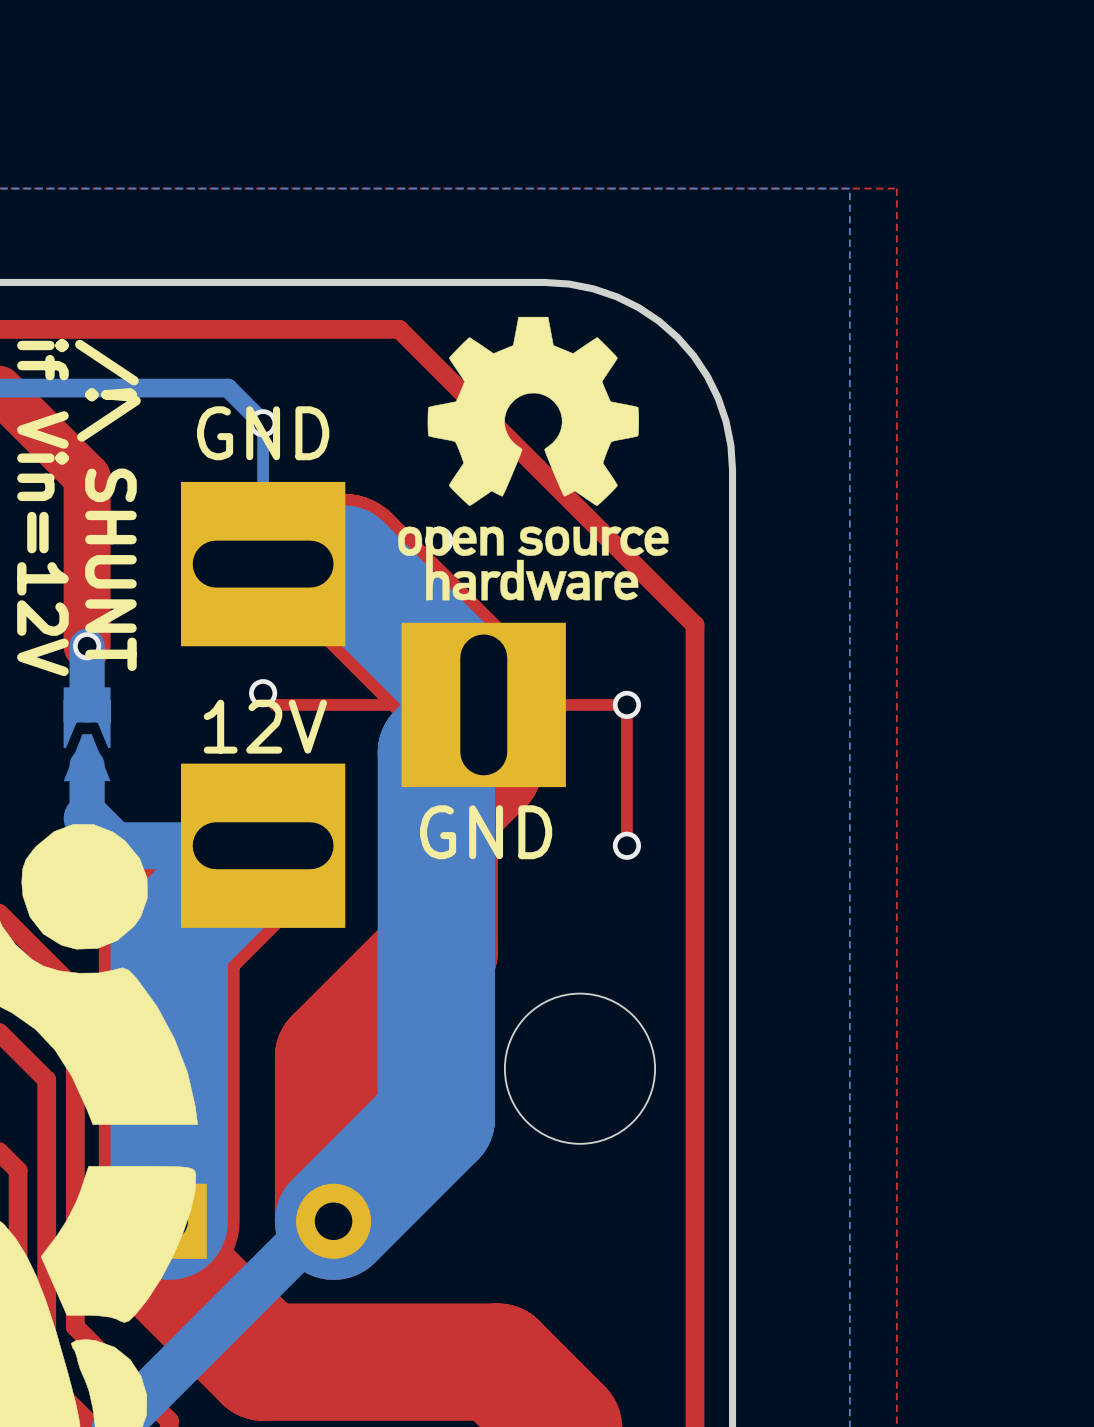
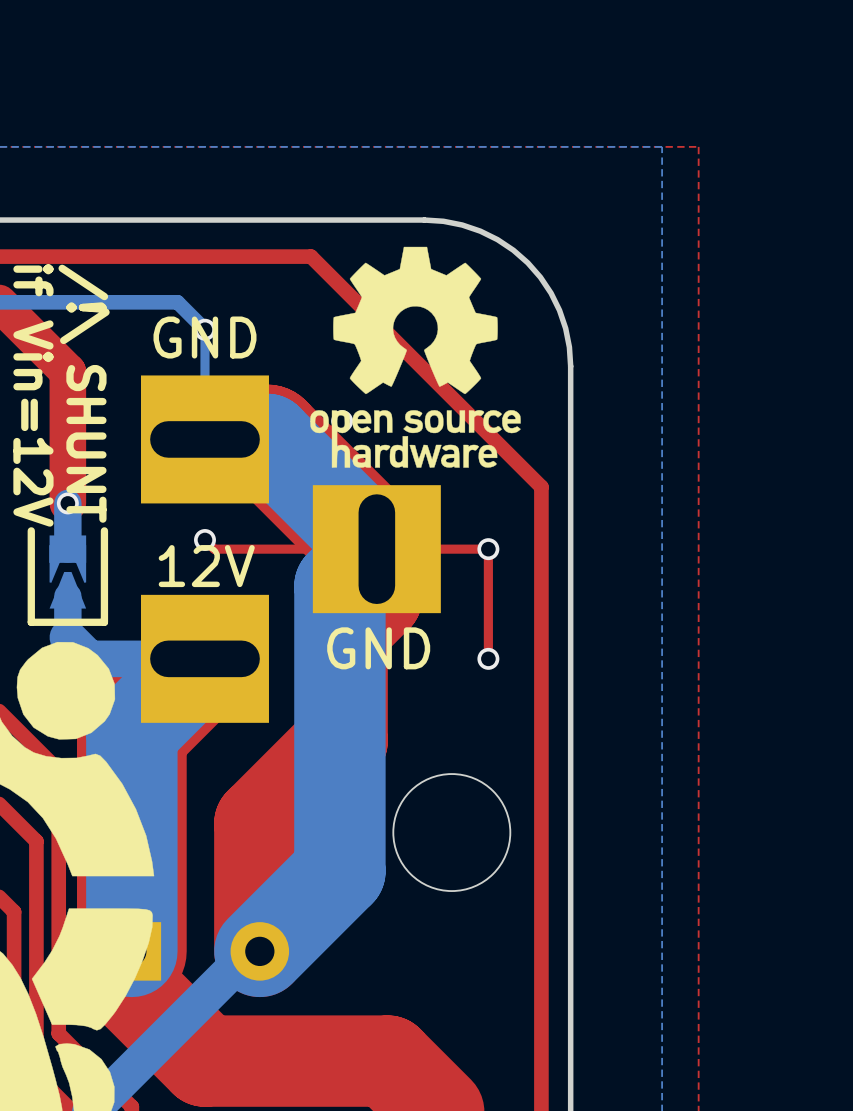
line: none -> (104, 530) (104, 622) (31, 622) (31, 530)

